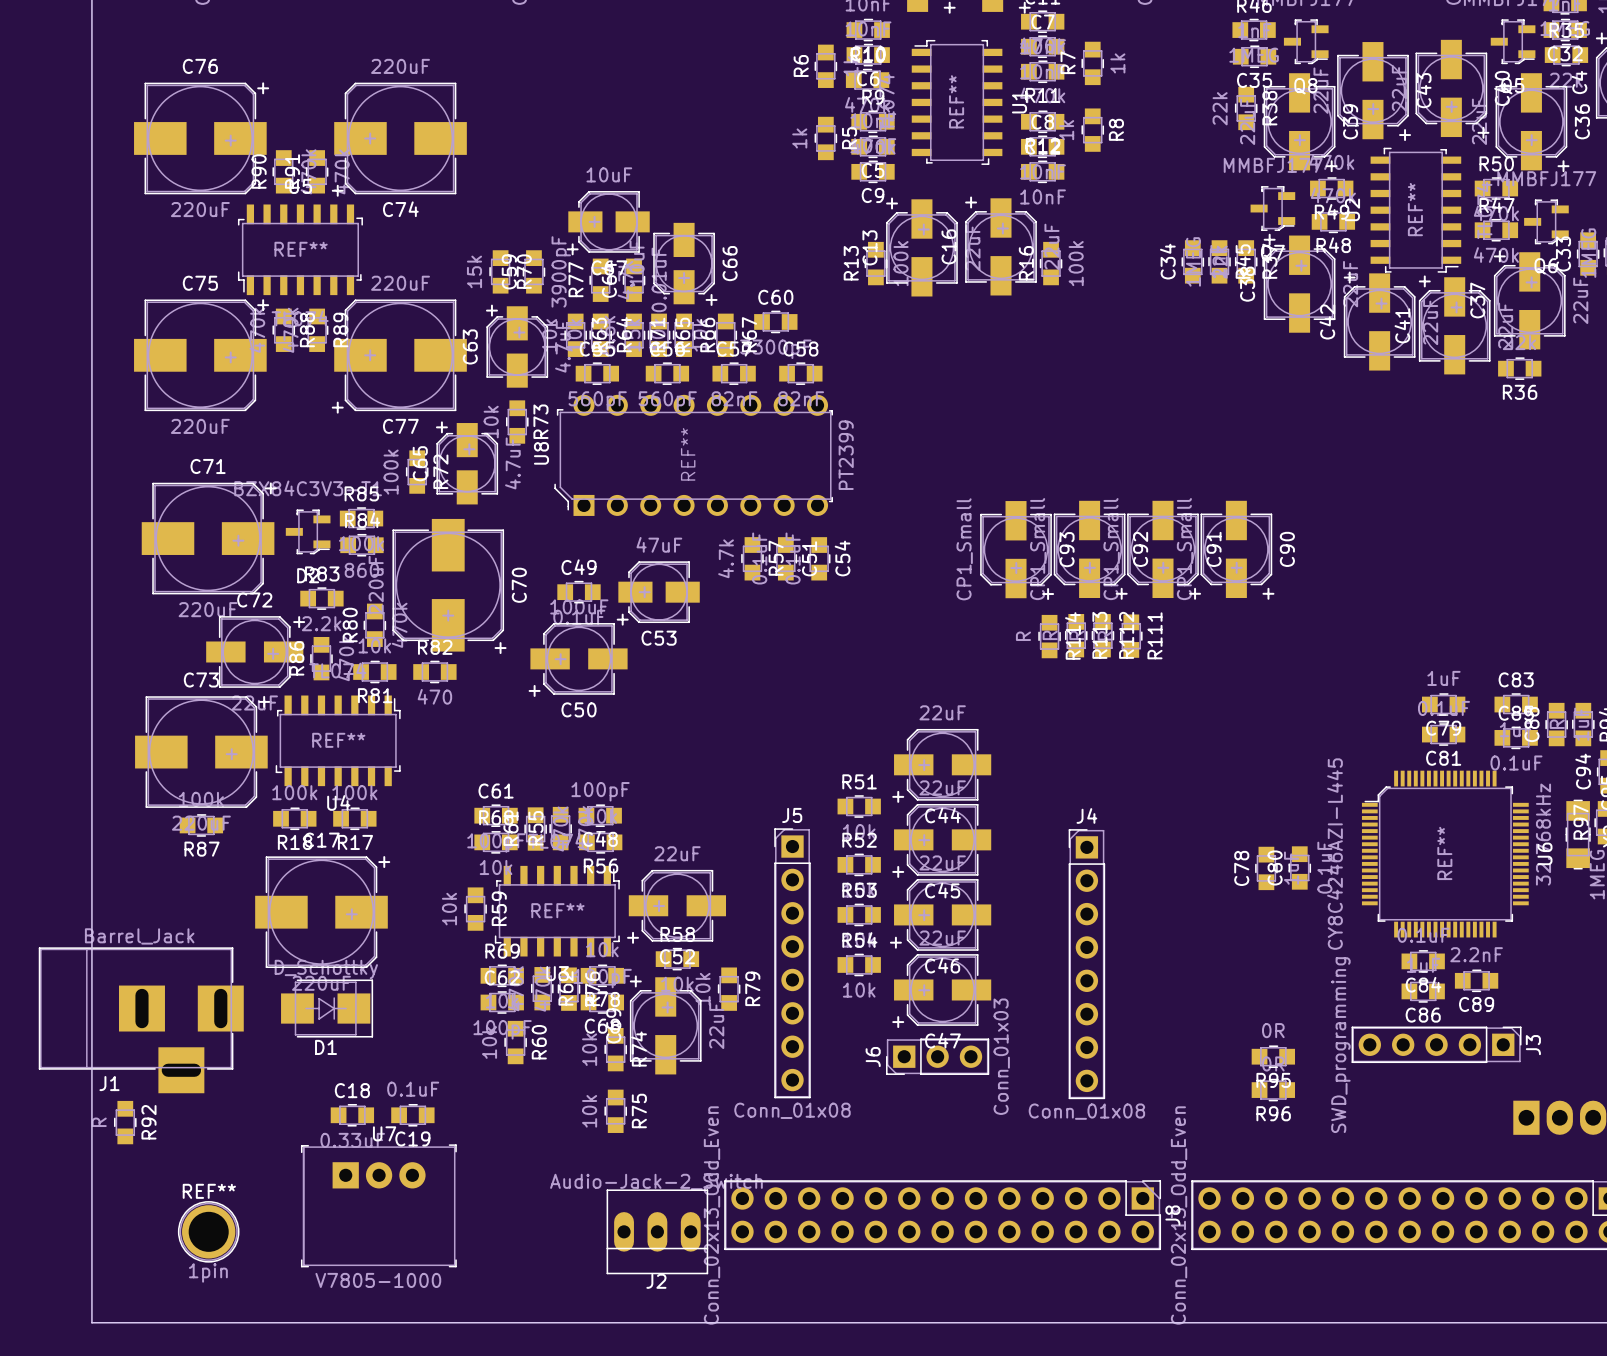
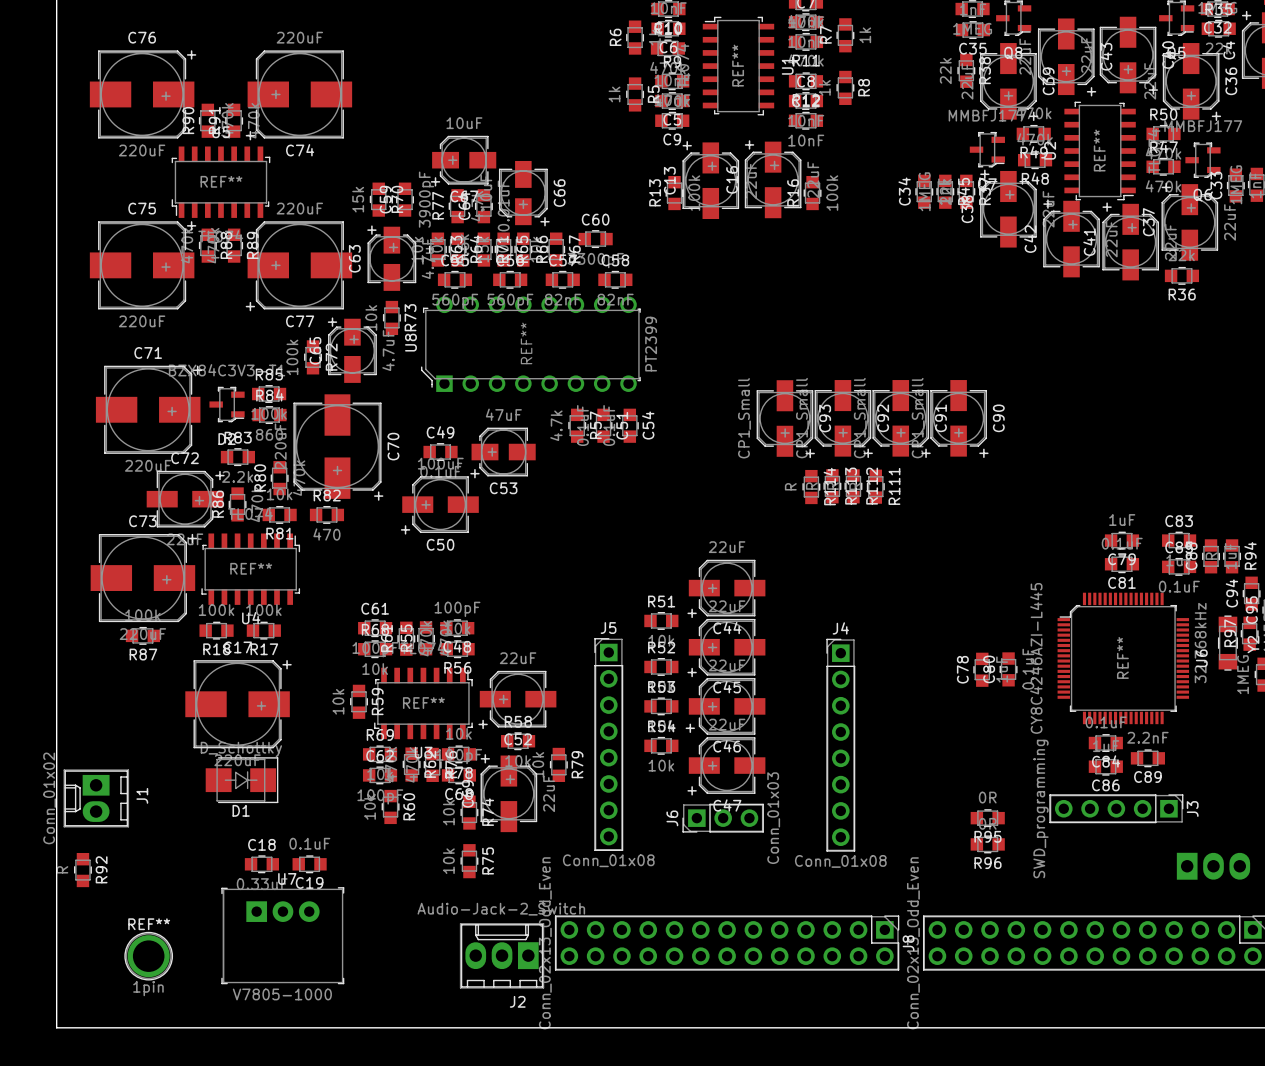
J1 value: Barrel_Jack (139, 936) -> Conn_01x02 (49, 798)
J1 footprint: [38, 947, 244, 1094] -> [63, 769, 130, 828]
J1 name position: J1 (109, 1083) -> J1 (142, 795)
J2 footprint: [606, 1189, 709, 1275] -> [459, 923, 545, 989]

